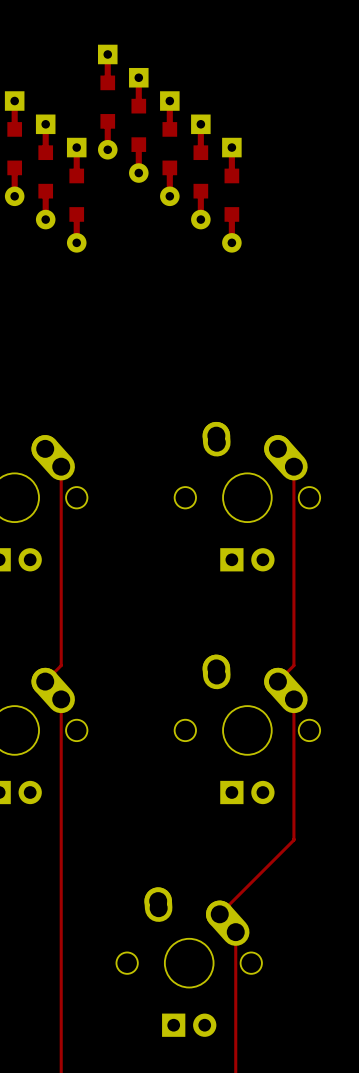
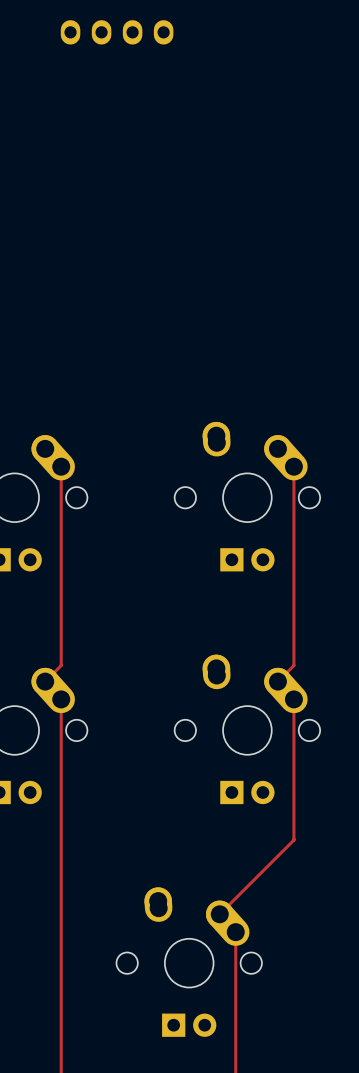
part: none -> (117, 32)
part: (107, 102) -> none
part: (138, 125) -> none
part: (14, 148) -> none
part: (169, 148) -> none
part: (45, 171) -> none
part: (200, 171) -> none
part: (76, 195) -> none
part: (231, 195) -> none

